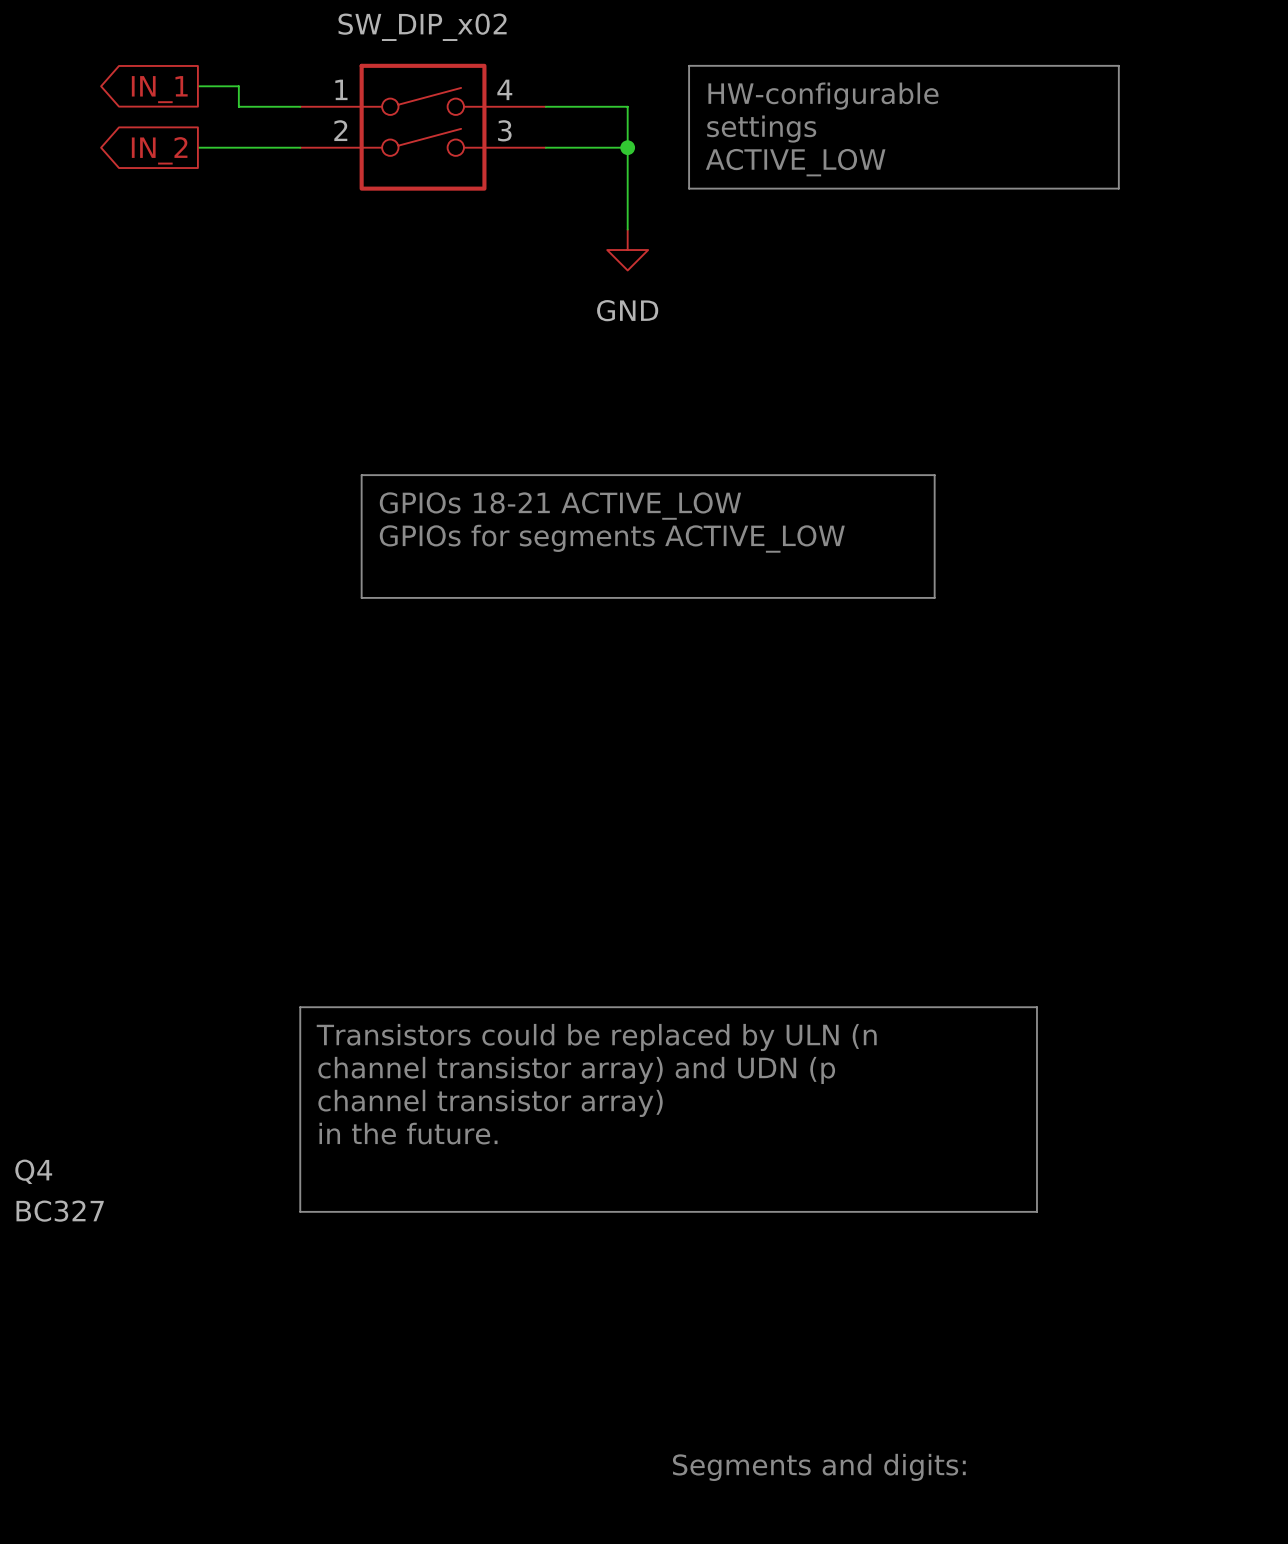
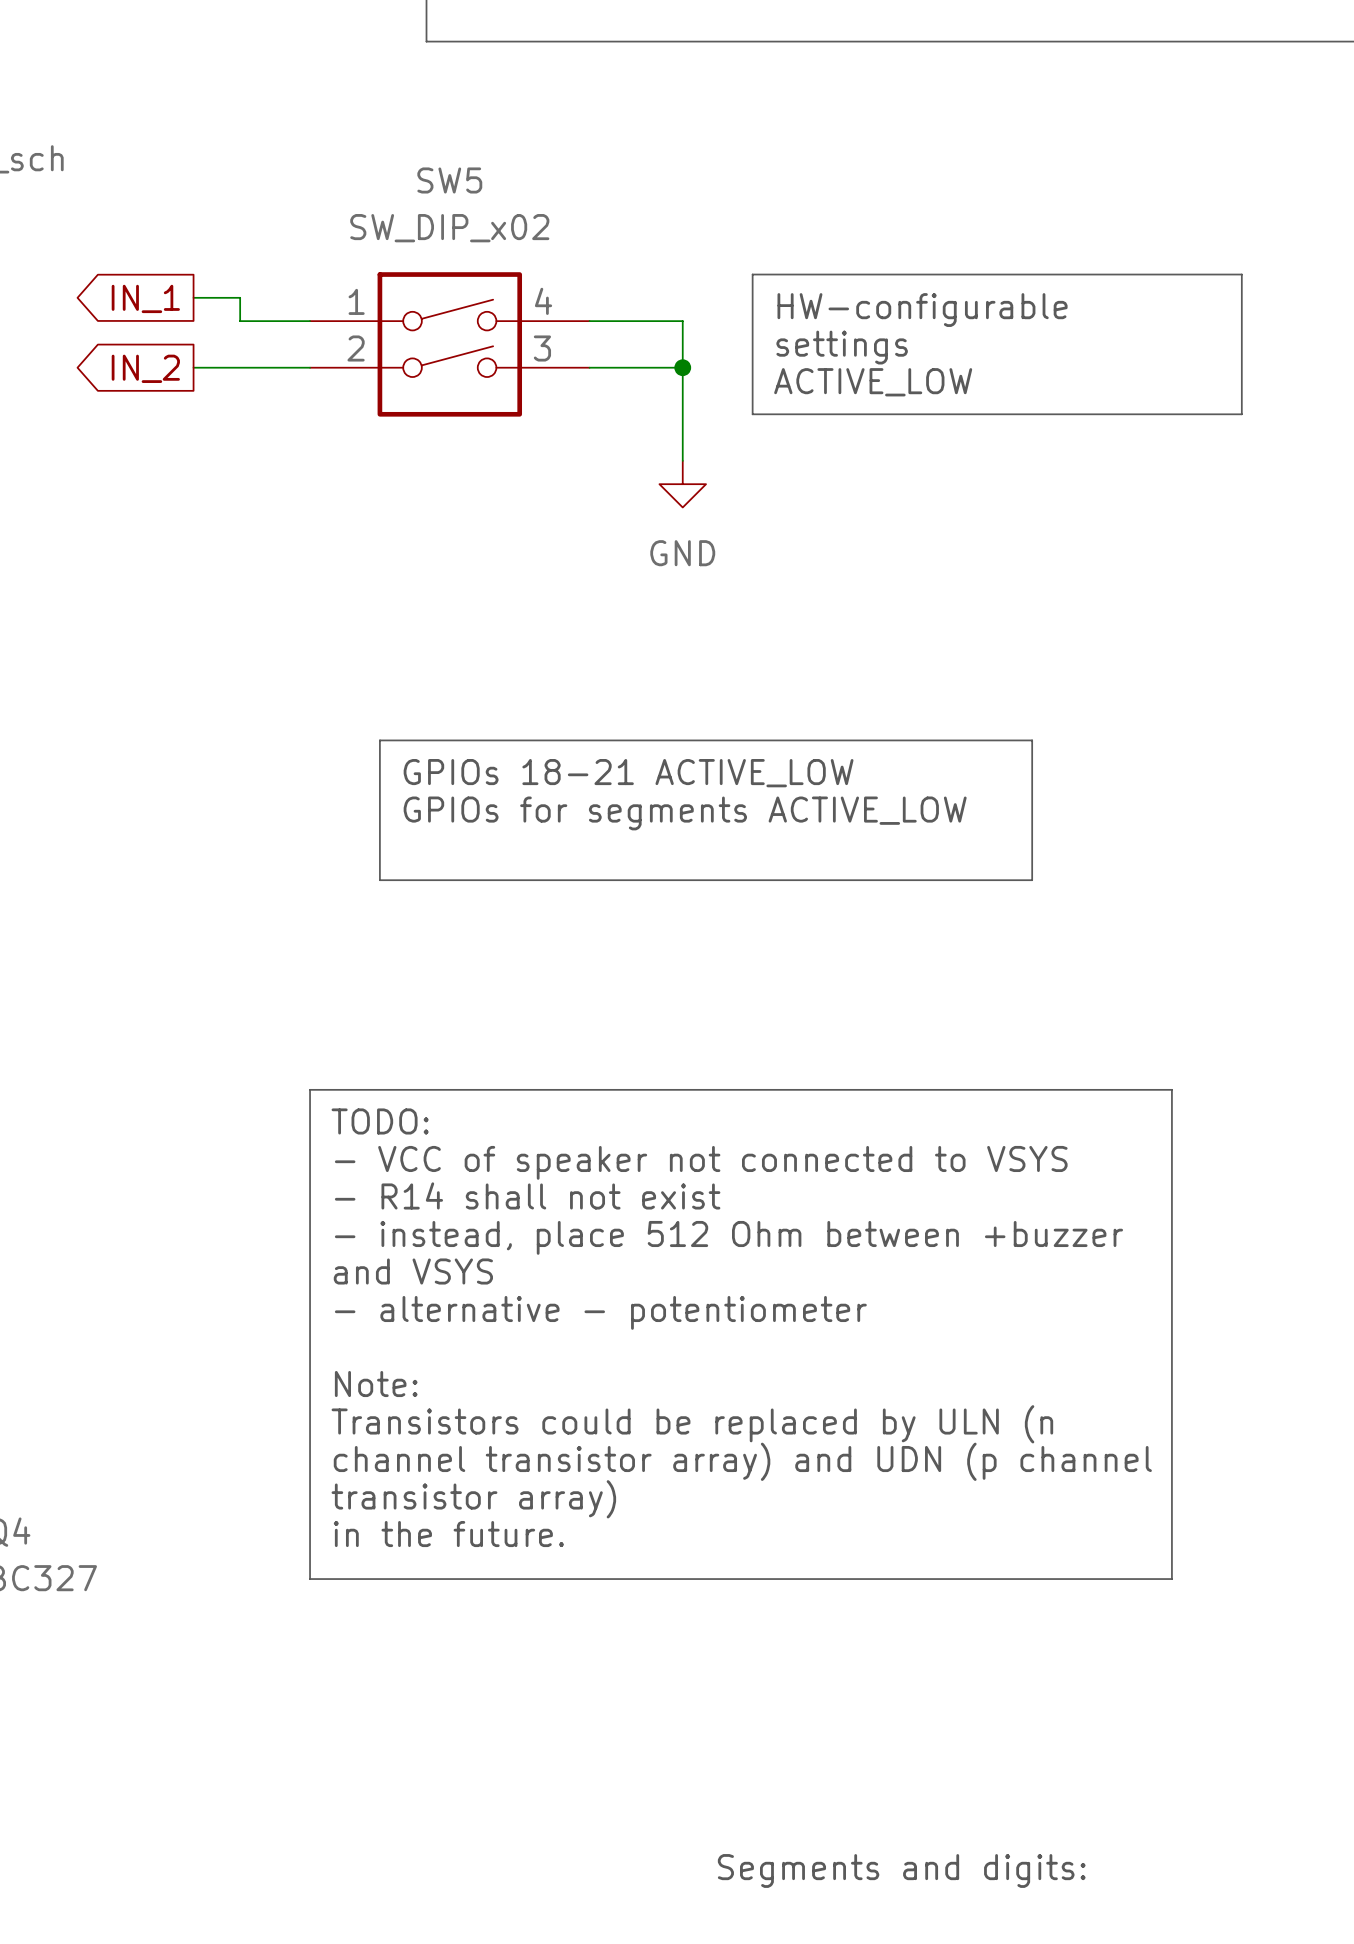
text: none -> TODO: (380, 1121)
text: none -> - VCC of speaker not connected to VSYS (701, 1162)
text: none -> - R14 shall not exist (527, 1195)
text: none -> - instead, place 512 Ohm between +buzzer (728, 1237)
text: none -> and VSYS (413, 1271)
text: none -> - alternative - potentiometer (600, 1312)
line: (300, 1007) (1036, 1007) (1036, 1211) -> (310, 1346) (310, 1089) (1171, 1089) (1171, 1579) (1148, 1579)
text position: Transistors could be replaced by ULN (n (596, 1037) -> Transistors could be replaced by ULN (n (692, 1424)
text: none -> Note: (376, 1384)
text: channel transistor array) and UDN (p (576, 1070) -> none
text: channel transistor array) (490, 1103) -> channel transistor array) and UDN (p channel (742, 1461)
text position: in the future. (408, 1133) -> in the future. (448, 1534)
text: none -> transistor array) (473, 1499)

